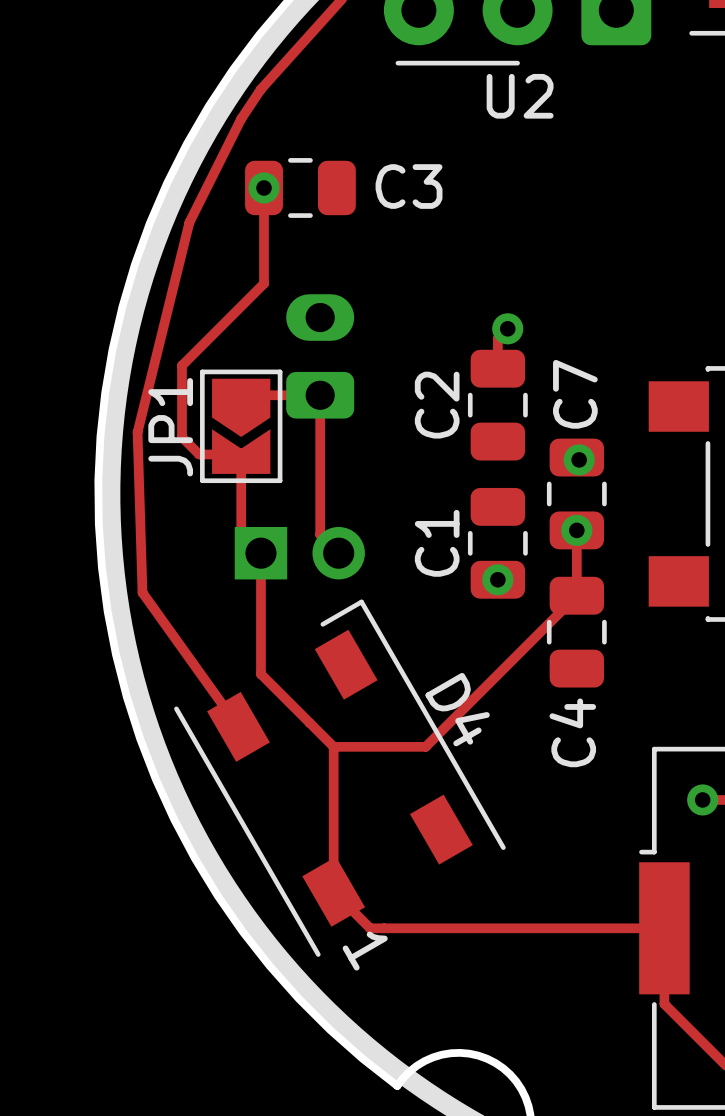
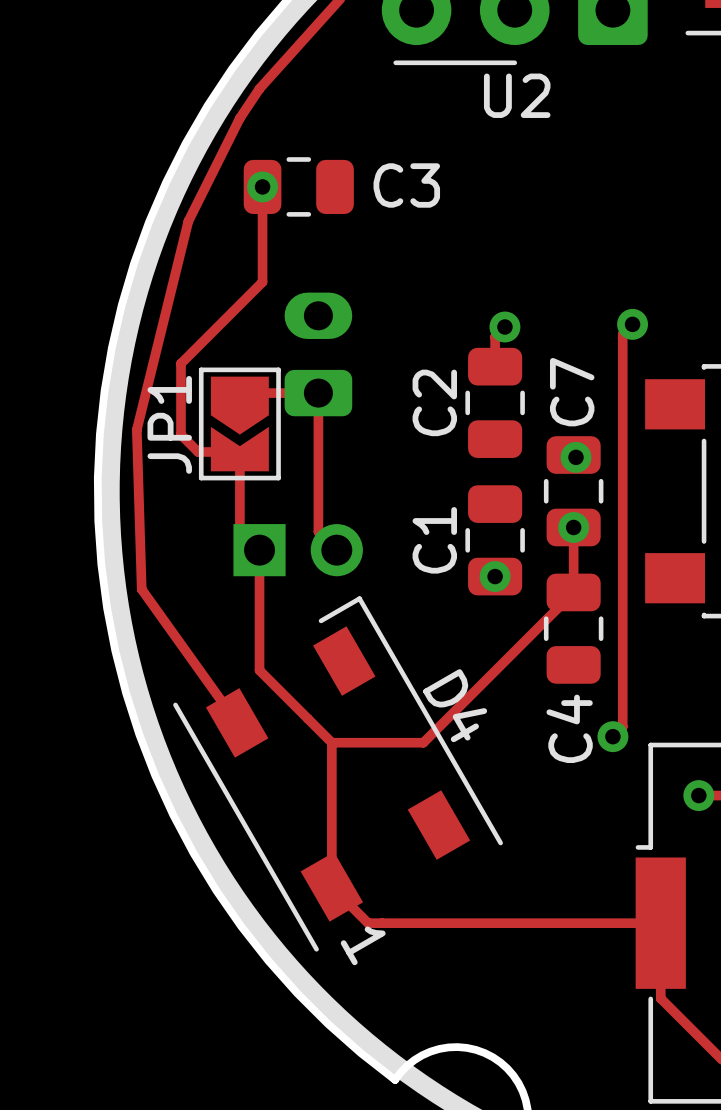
track: none -> (632, 324) (622, 334) (622, 726) (612, 736)
via: none -> (632, 324)
via: none -> (612, 736)

